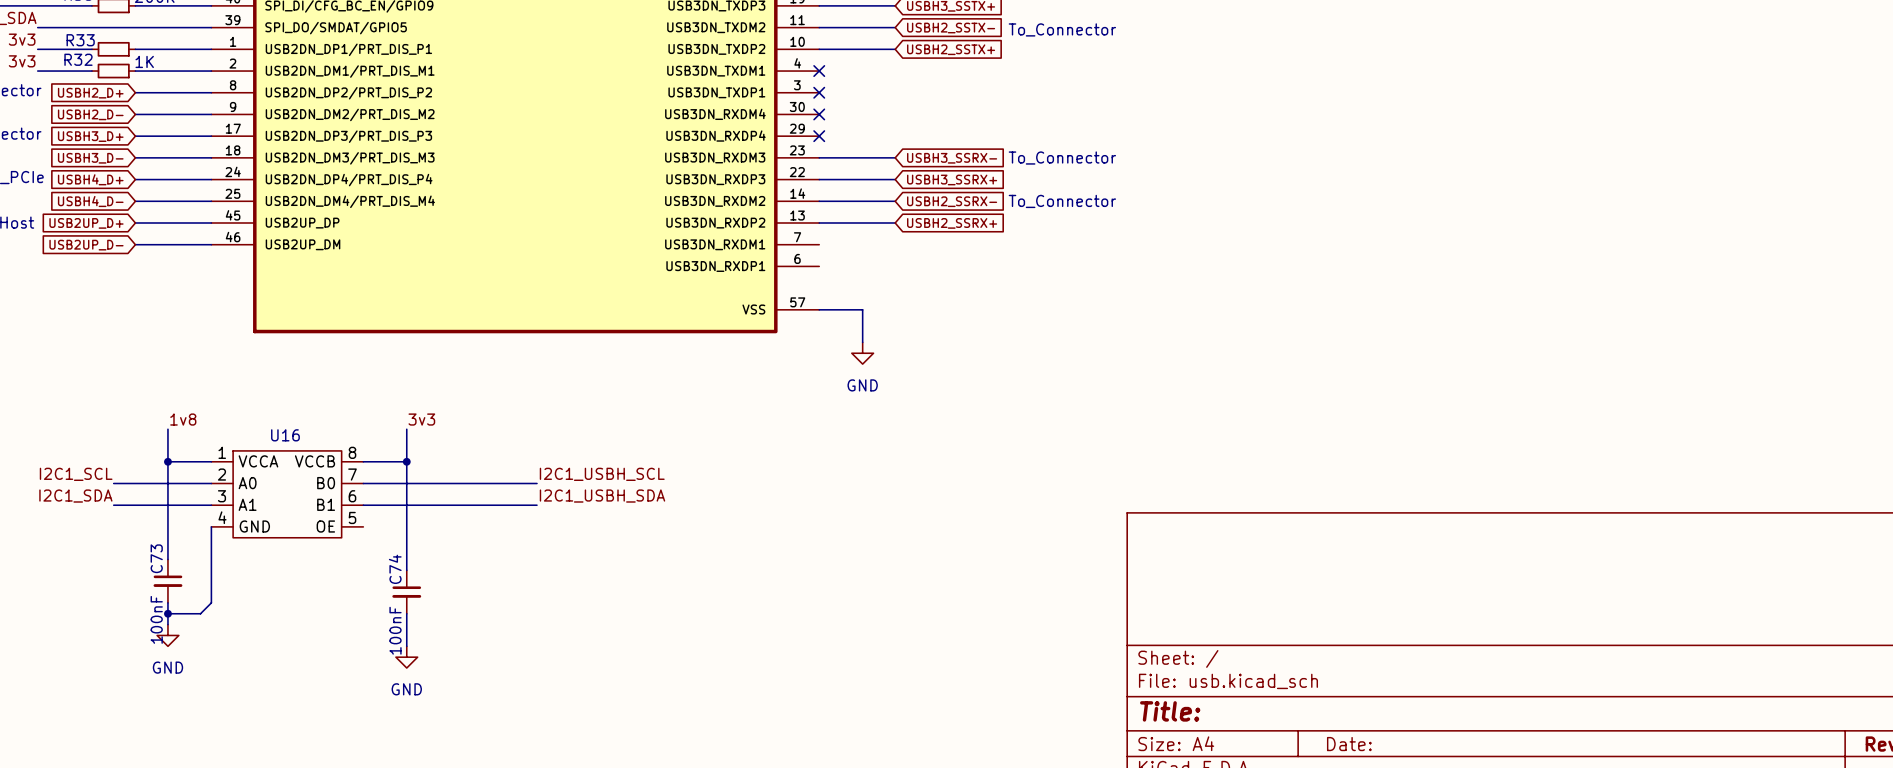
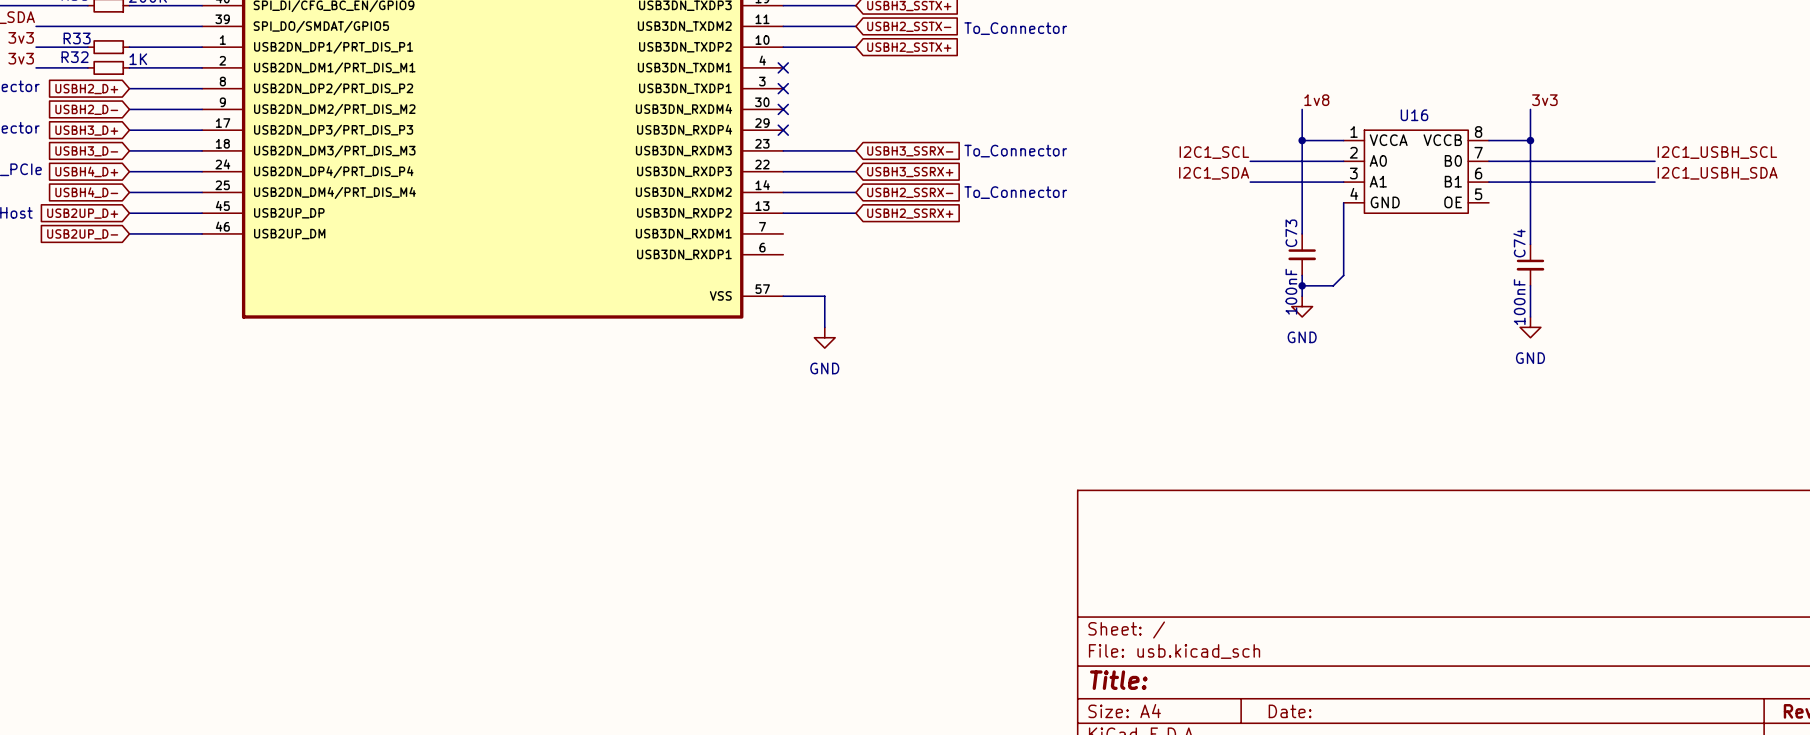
label: none -> 1v8 (1316, 100)
label: none -> 3v3 (1544, 100)
wire: none -> (1302, 109) (1302, 233)
wire: none -> (1530, 109) (1530, 244)
wire: none -> (1302, 140) (1343, 140)
junction: none -> (1302, 140)
wire: none -> (1488, 140) (1530, 140)
junction: none -> (1530, 140)
label: none -> I2C1_SCL (1214, 152)
label: none -> I2C1_USBH_SCL (1717, 152)
wire: none -> (1250, 161) (1343, 161)
wire: none -> (1488, 161) (1655, 161)
label: none -> I2C1_SDA (1214, 173)
label: none -> I2C1_USBH_SDA (1717, 173)
wire: none -> (1250, 182) (1343, 182)
wire: none -> (1488, 182) (1655, 182)
wire: none -> (1343, 202) (1343, 275) (1333, 285) (1302, 285)
wire: none -> (1302, 275) (1302, 296)
junction: none -> (1302, 285)
wire: none -> (1530, 285) (1530, 316)
power symbol: none -> GND (1302, 306)
power symbol: none -> GND (1530, 327)
label: 1v8 (183, 419) -> none
label: 3v3 (421, 419) -> none
wire: (167, 429) (167, 559) -> none
wire: (406, 429) (406, 570) -> none
wire: (167, 461) (211, 461) -> none
junction: (167, 461) -> none
wire: (363, 461) (406, 461) -> none
junction: (406, 461) -> none
label: I2C1_SCL (76, 474) -> none
label: I2C1_USBH_SCL (602, 474) -> none
wire: (113, 483) (211, 483) -> none
wire: (363, 483) (537, 483) -> none
U16 position: (287, 494) -> (1416, 171)
label: I2C1_SDA (75, 496) -> none
label: I2C1_USBH_SDA (602, 496) -> none
wire: (113, 505) (211, 505) -> none
wire: (363, 505) (537, 505) -> none
wire: (211, 526) (211, 602) (200, 613) (167, 613) -> none
C73 position: (167, 581) -> (1302, 254)
C74 position: (406, 592) -> (1530, 265)
wire: (167, 602) (167, 624) -> none
junction: (167, 613) -> none
wire: (406, 613) (406, 646) -> none
power symbol: GND (167, 635) -> none
power symbol: GND (406, 657) -> none

